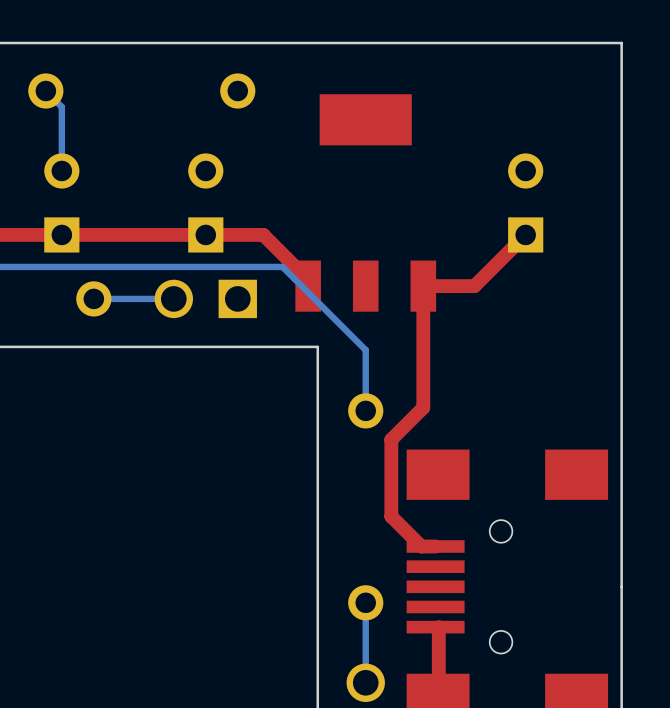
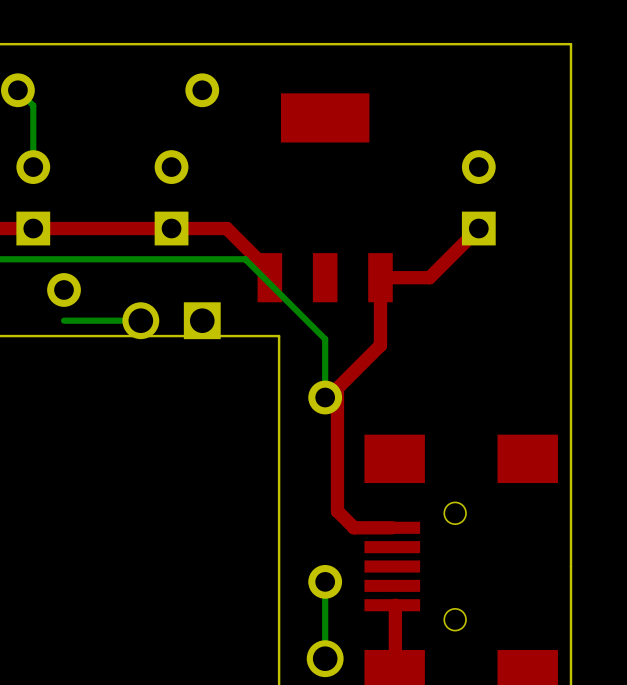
bottom track: (173, 298) (93, 298) -> (140, 320) (64, 320)
part position: (205, 298) -> (171, 320)
top track: (423, 356) (423, 407) (391, 439) (391, 516) (421, 546) -> (380, 345) (337, 388) (337, 511) (354, 527) (378, 527)

